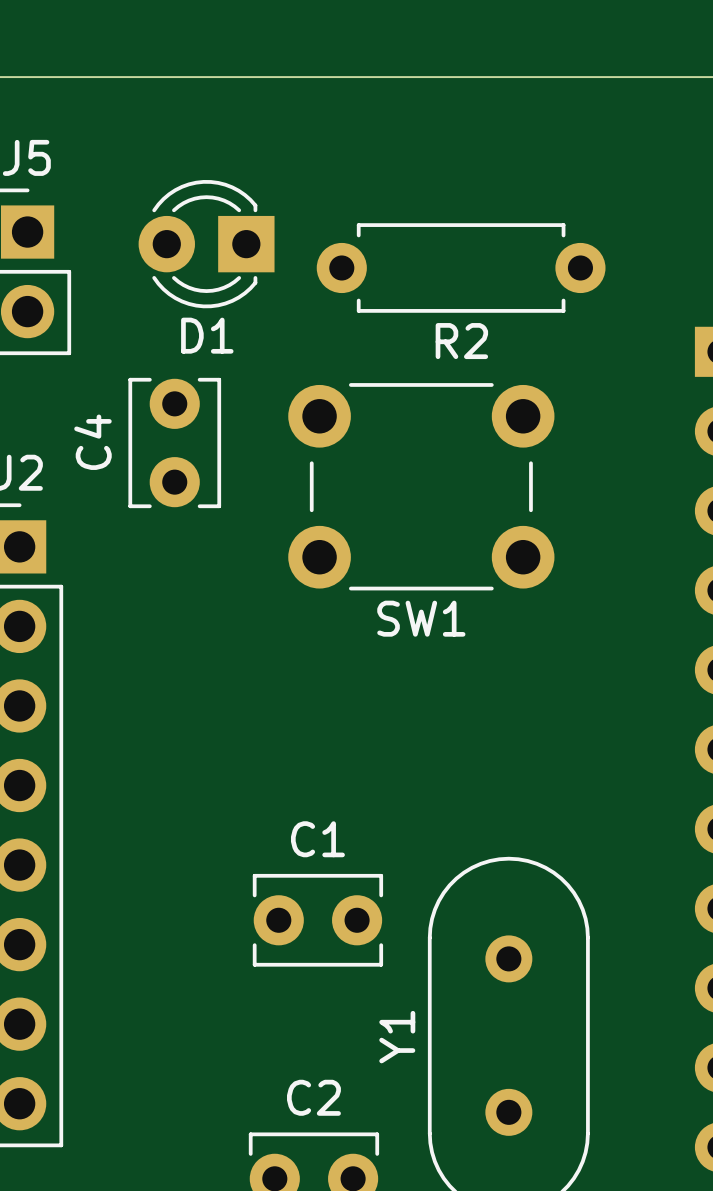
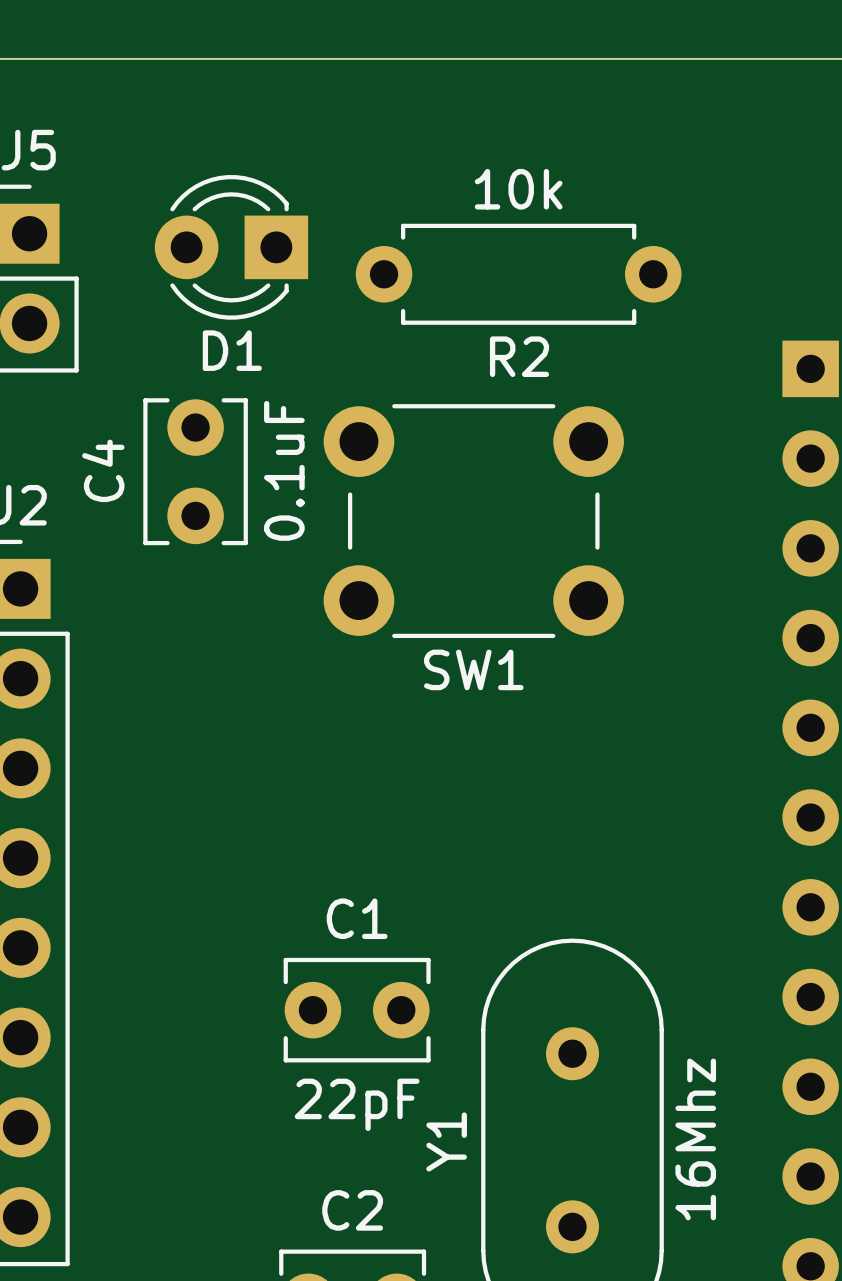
R2 value: none -> 10k (518, 189)
C4 value: none -> 0.1uF (284, 470)
C1 value: none -> 22pF (357, 1104)
Y1 value: none -> 16Mhz (695, 1139)

